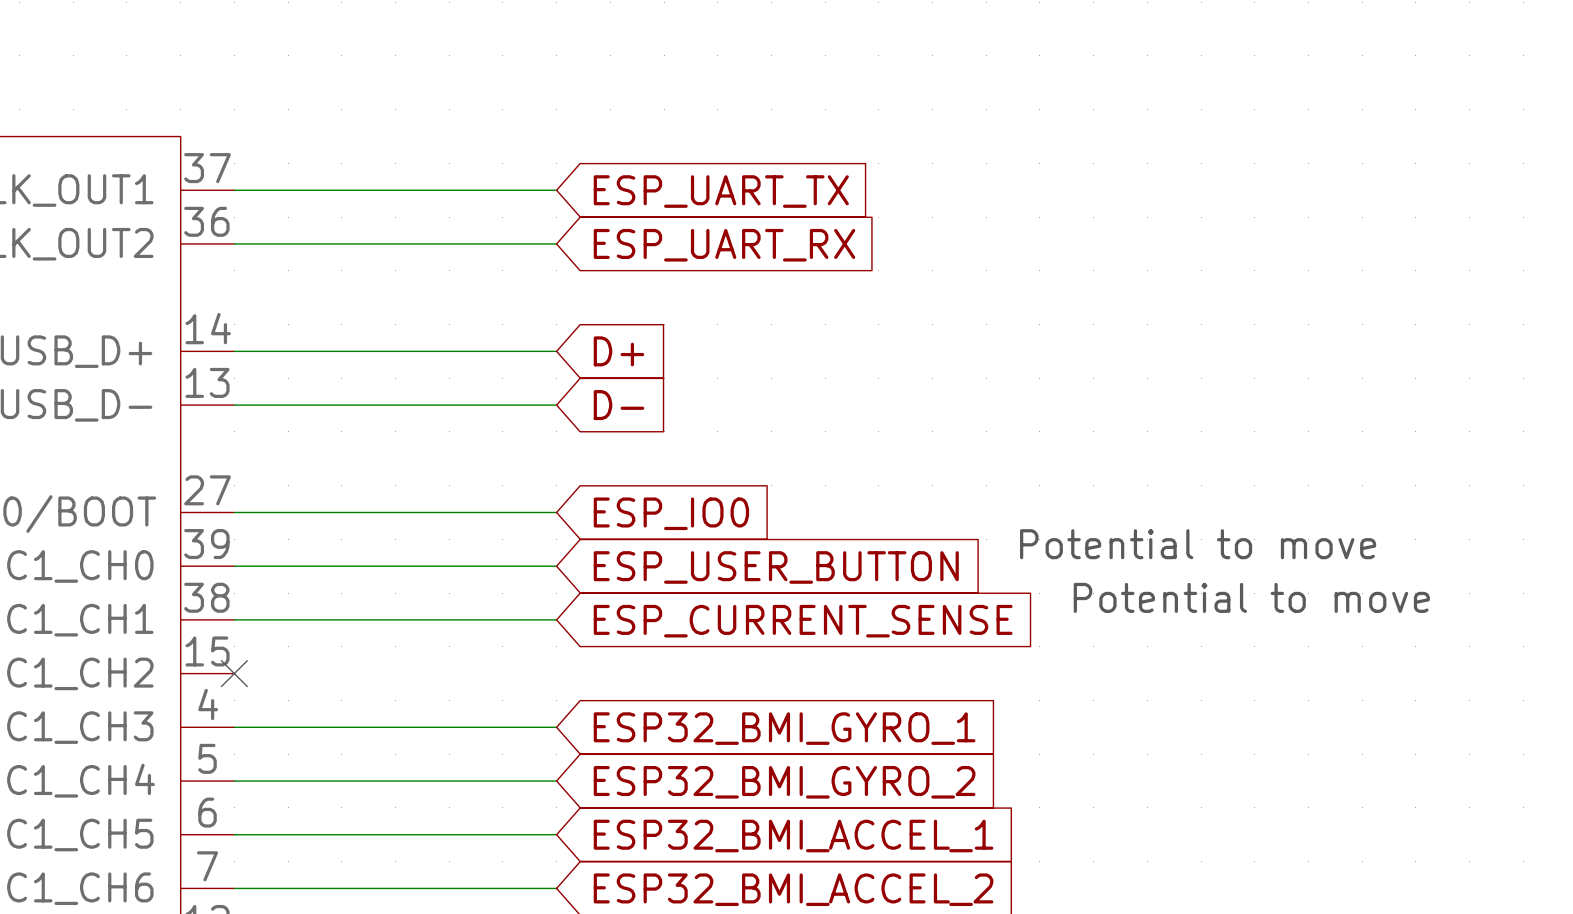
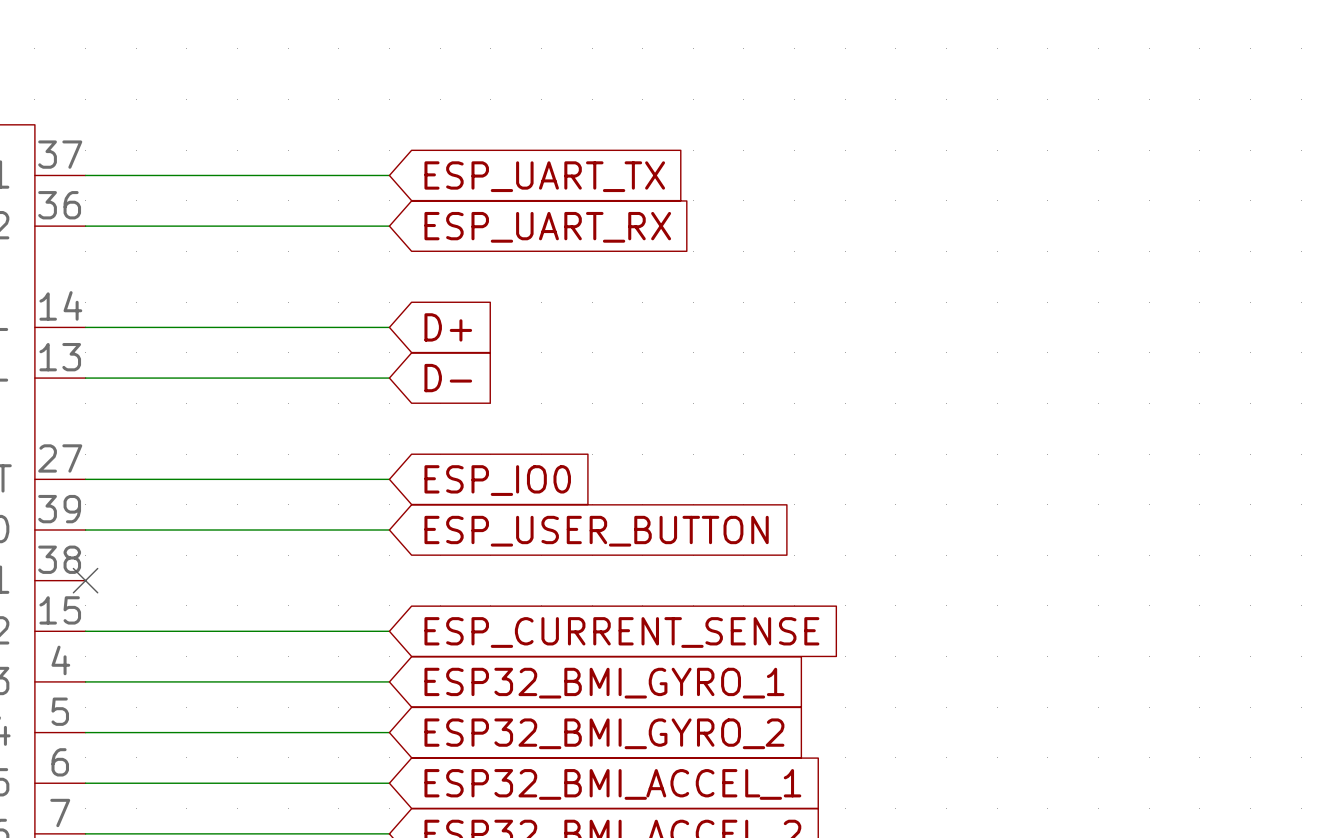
text: Potential to move (1198, 544) -> none
text: Potential to move (1251, 597) -> none
wire: (234, 619) (556, 619) -> (85, 631) (389, 631)
global label position: ESP_CURRENT_SENSE (803, 621) -> ESP_CURRENT_SENSE (621, 632)
no-connect mark position: (234, 673) -> (85, 580)

